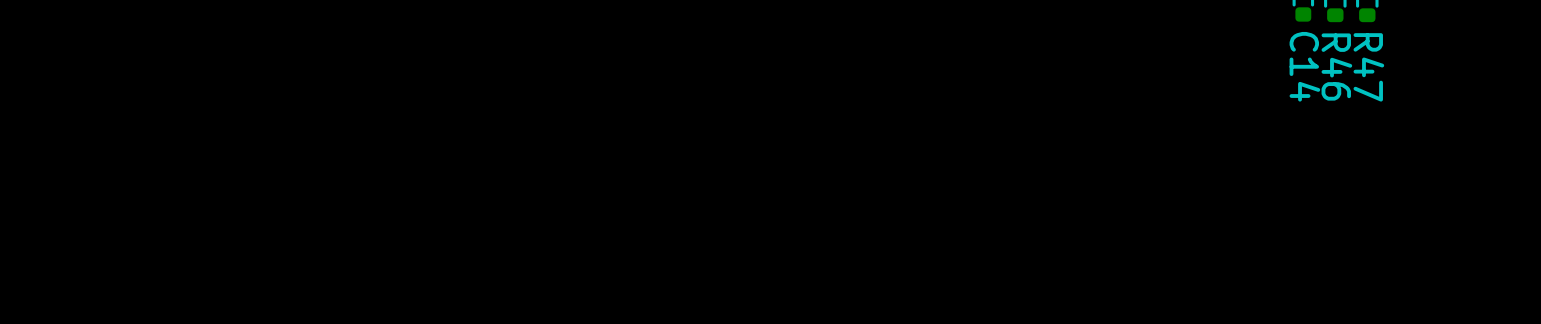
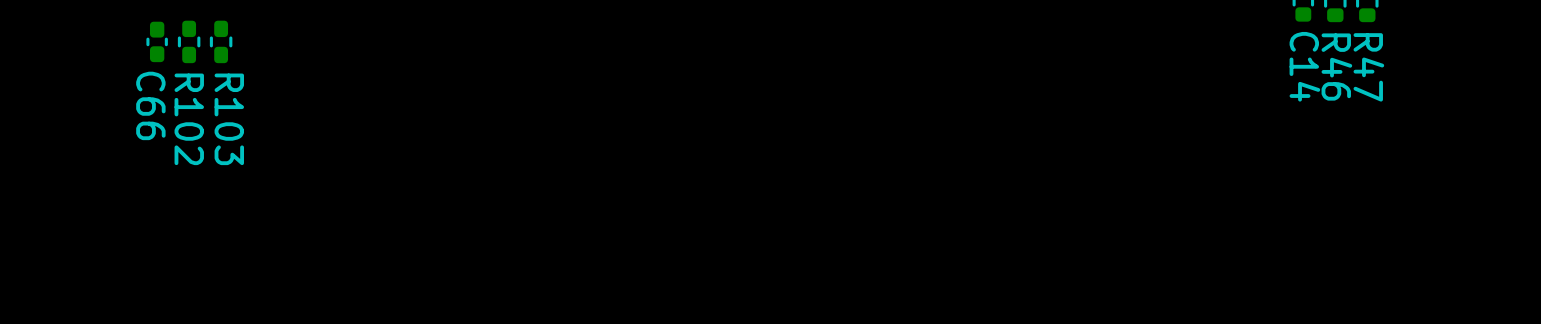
C66: none -> (157, 41)
R102: none -> (189, 41)
R103: none -> (221, 41)

